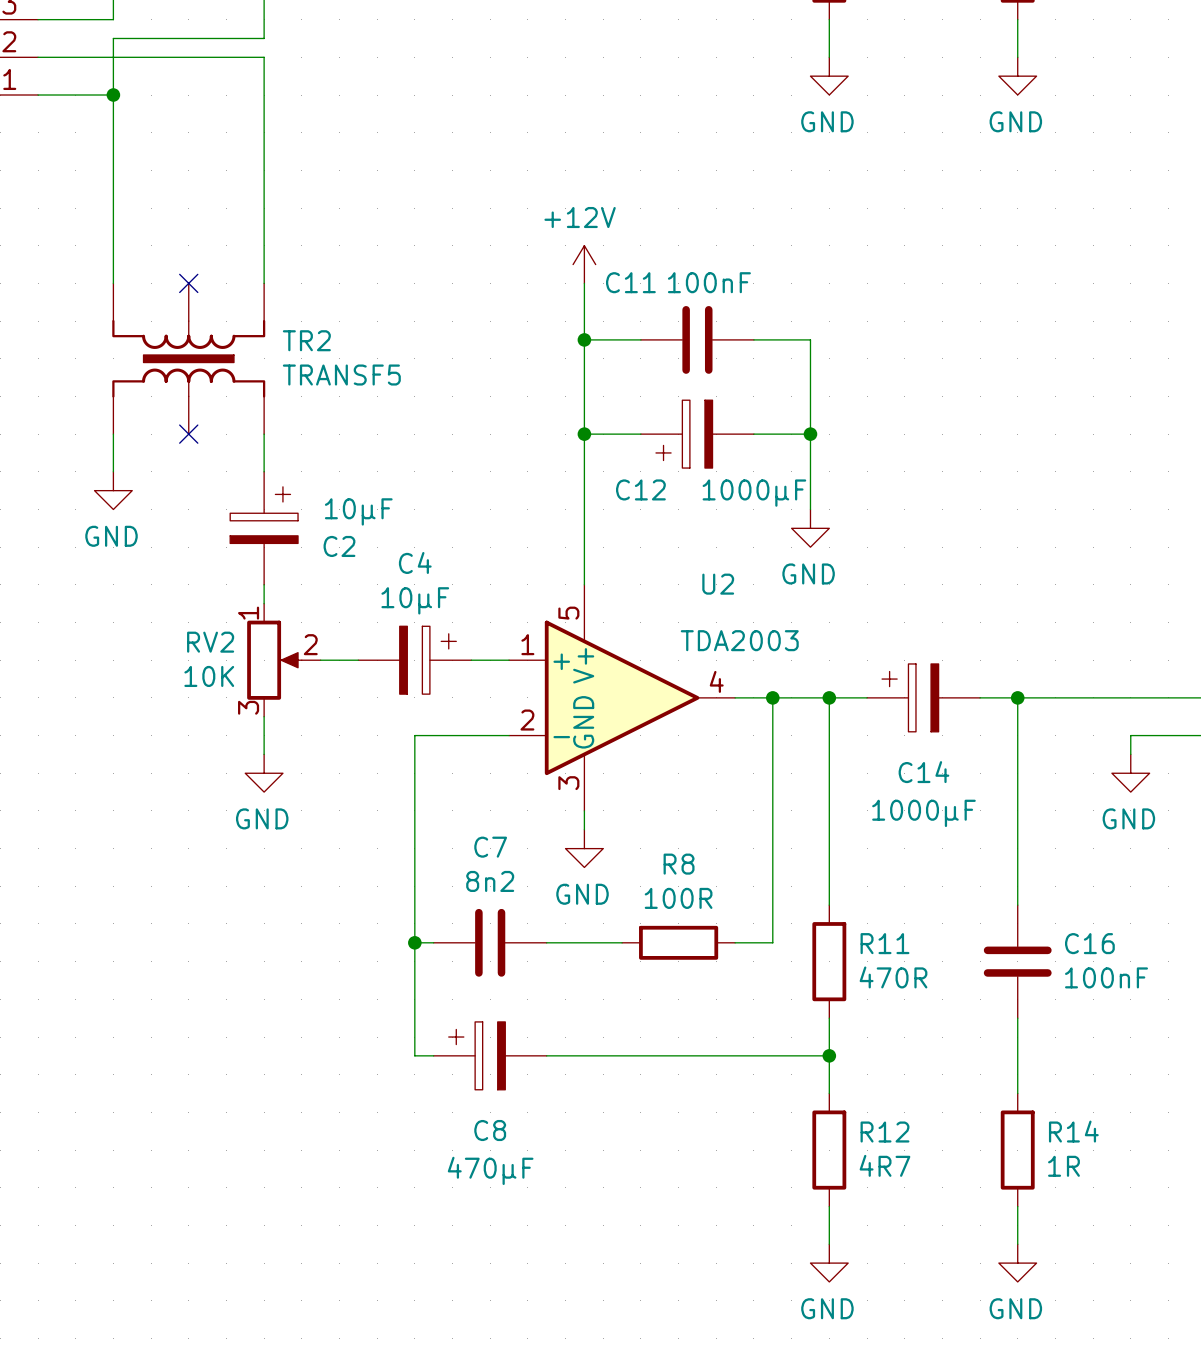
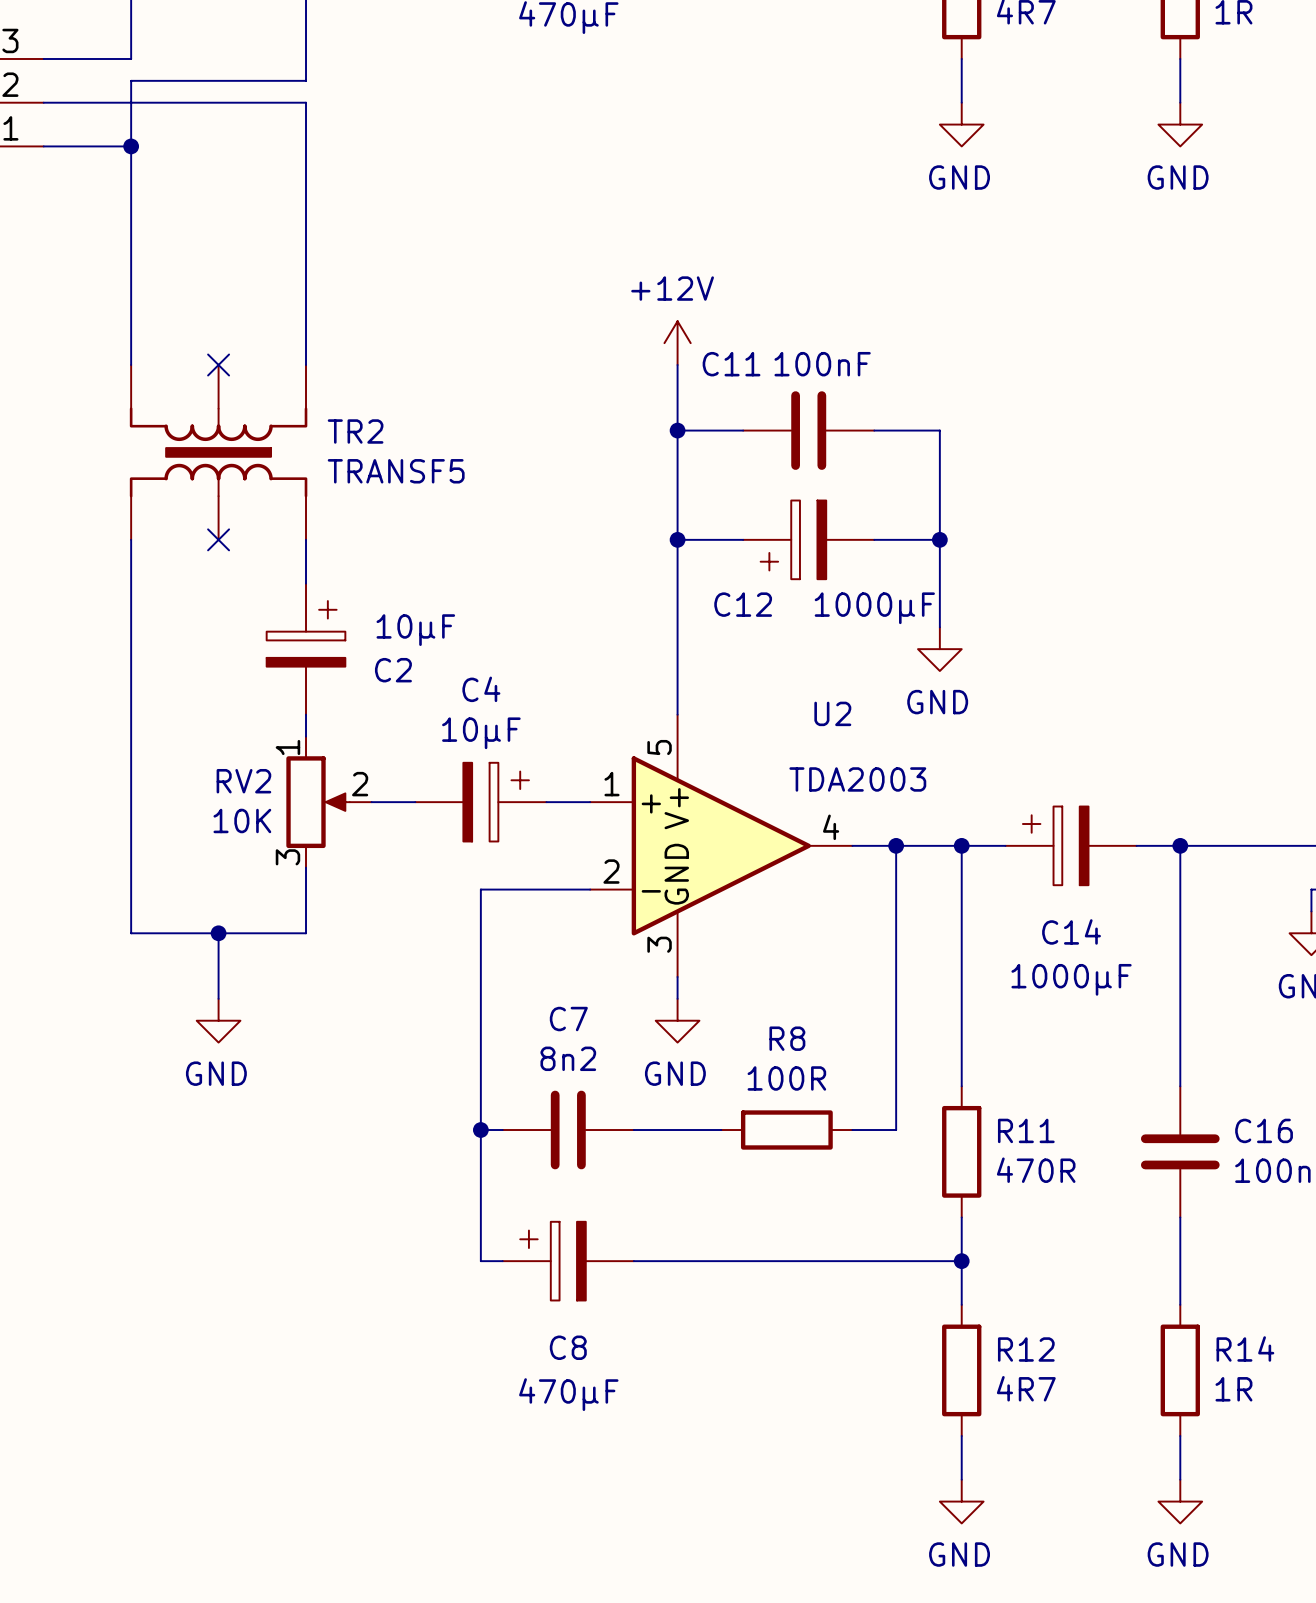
wire: none -> (131, 583) (131, 933) (306, 933) (306, 911)
power symbol: GND (113, 490) -> none
wire: none -> (218, 933) (218, 998)
junction: none -> (218, 933)
power symbol position: GND (264, 773) -> GND (218, 1020)

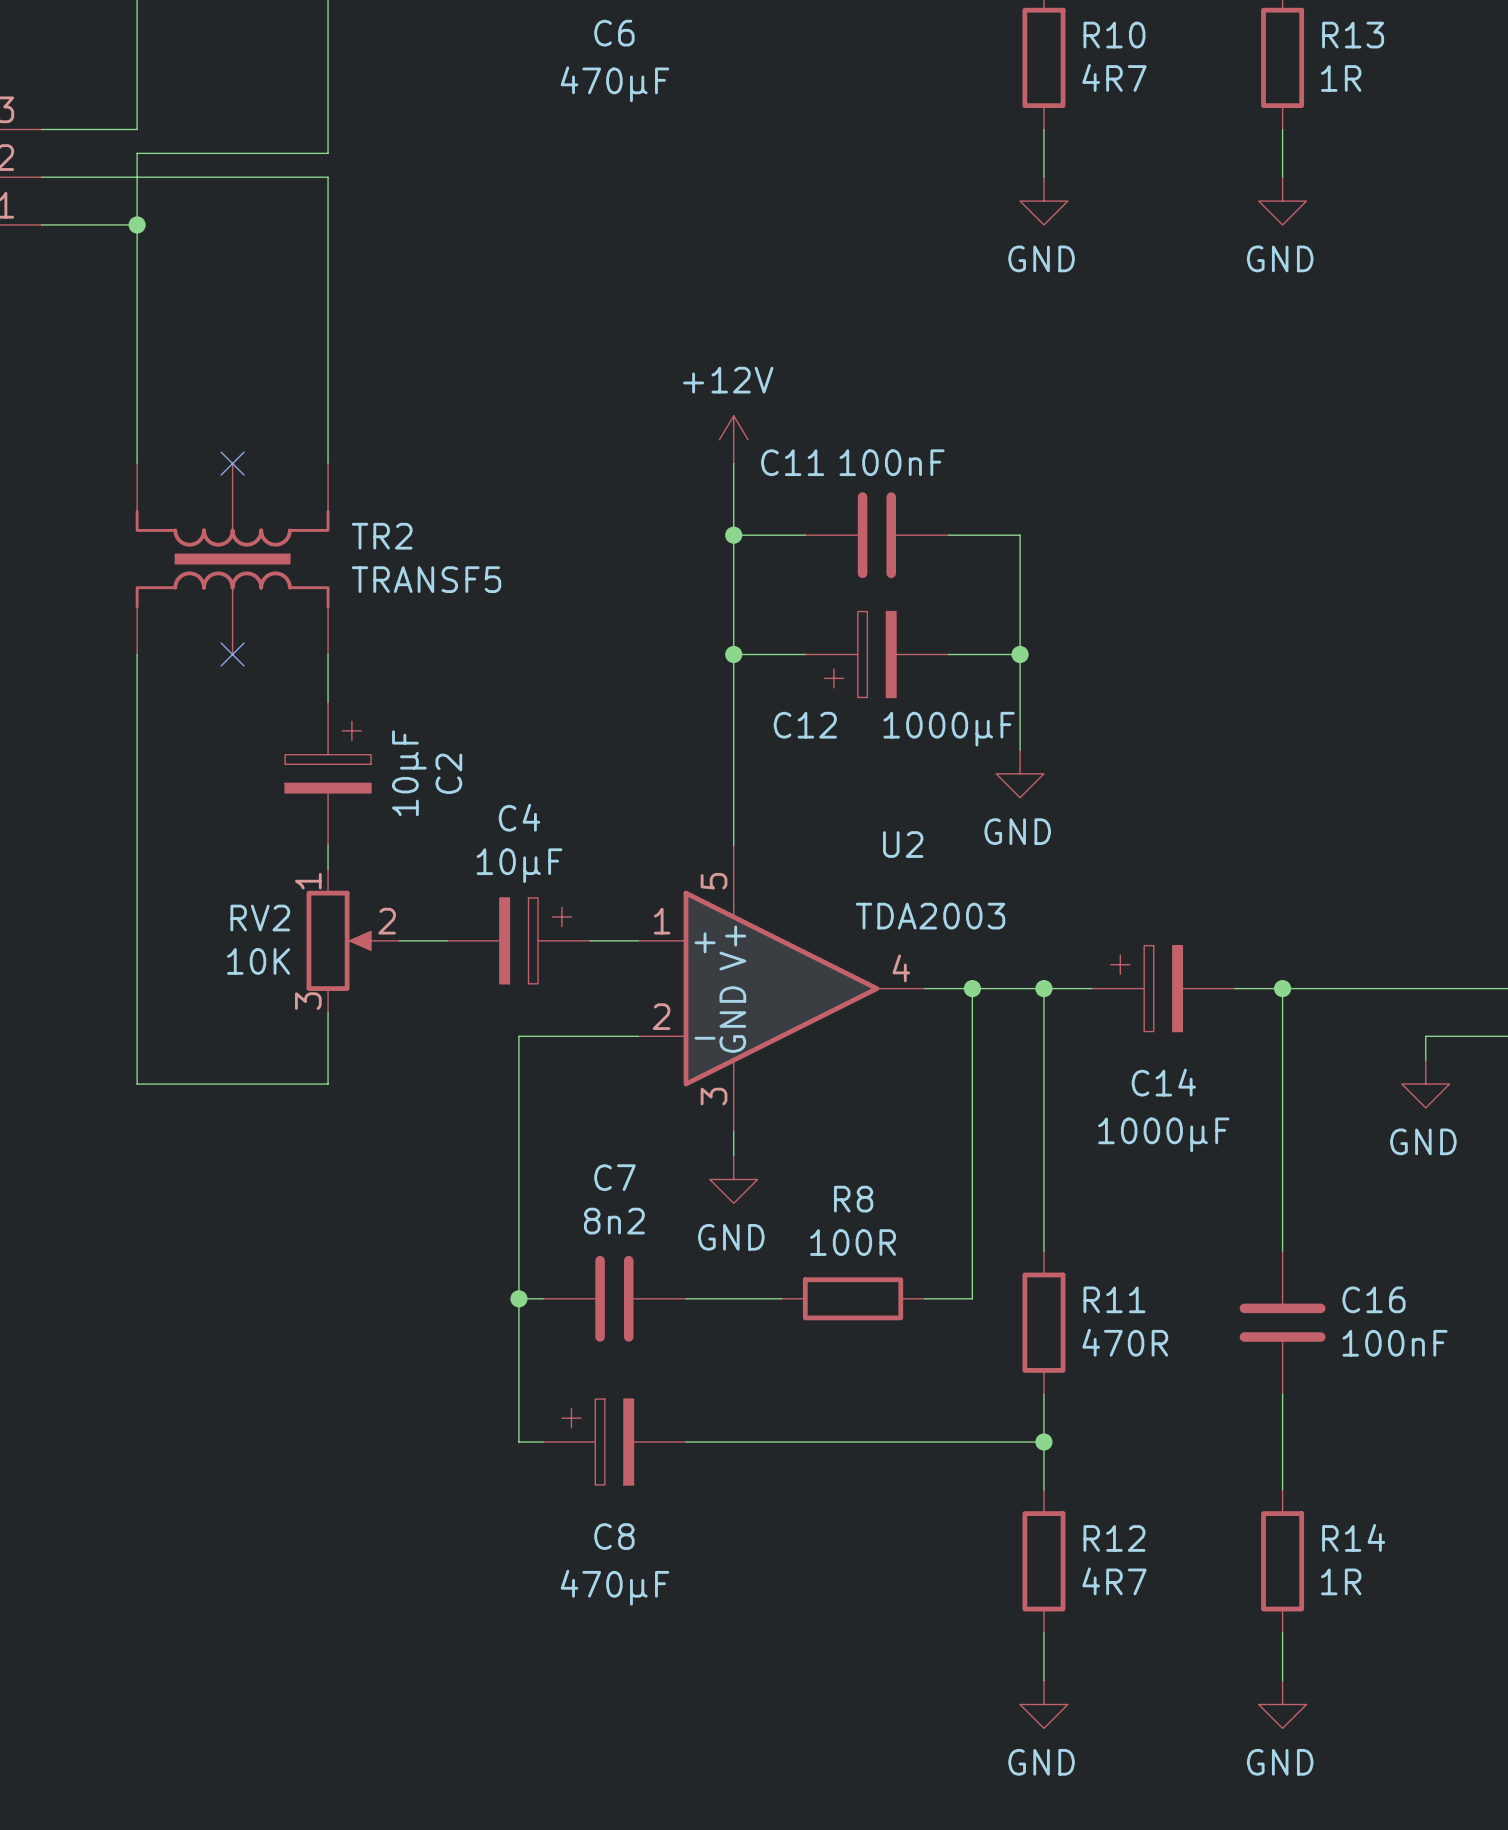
C2 value rotation: 0° (415, 630) -> 90° counterclockwise (409, 773)
C2 name rotation: 0° (393, 670) -> 90° counterclockwise (448, 773)
wire: (218, 933) (218, 998) -> none
junction: (218, 933) -> none
power symbol: GND (218, 1020) -> none

